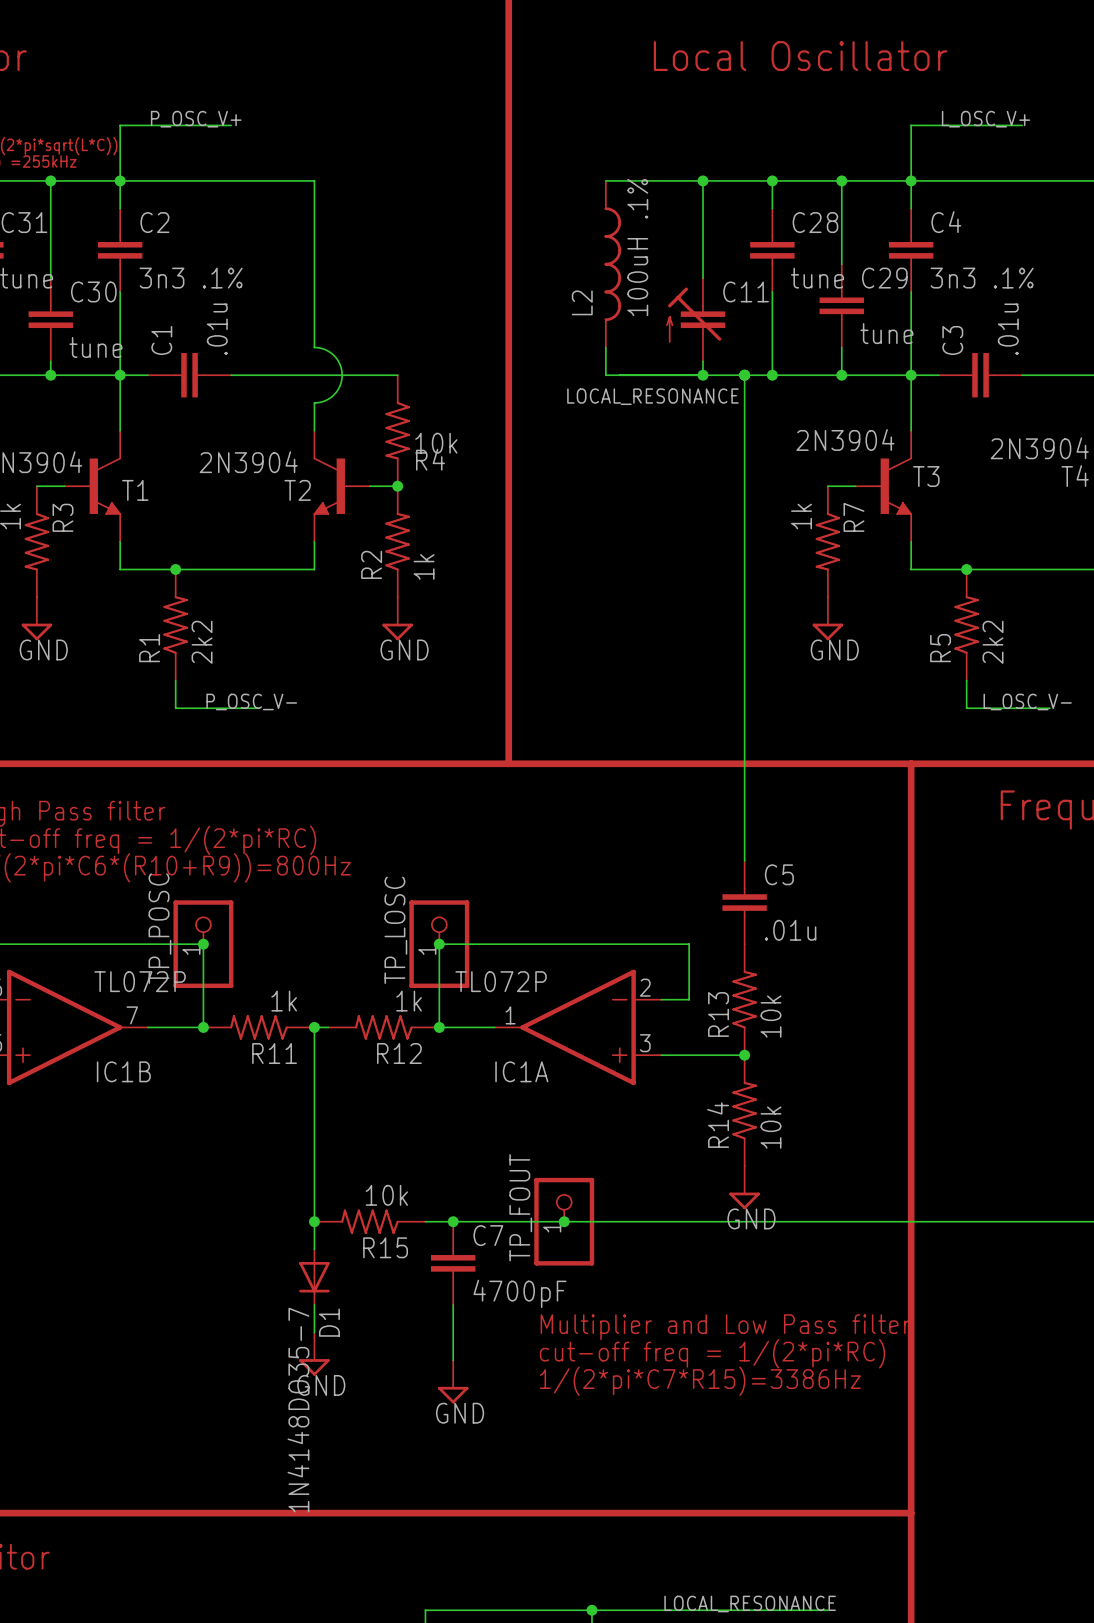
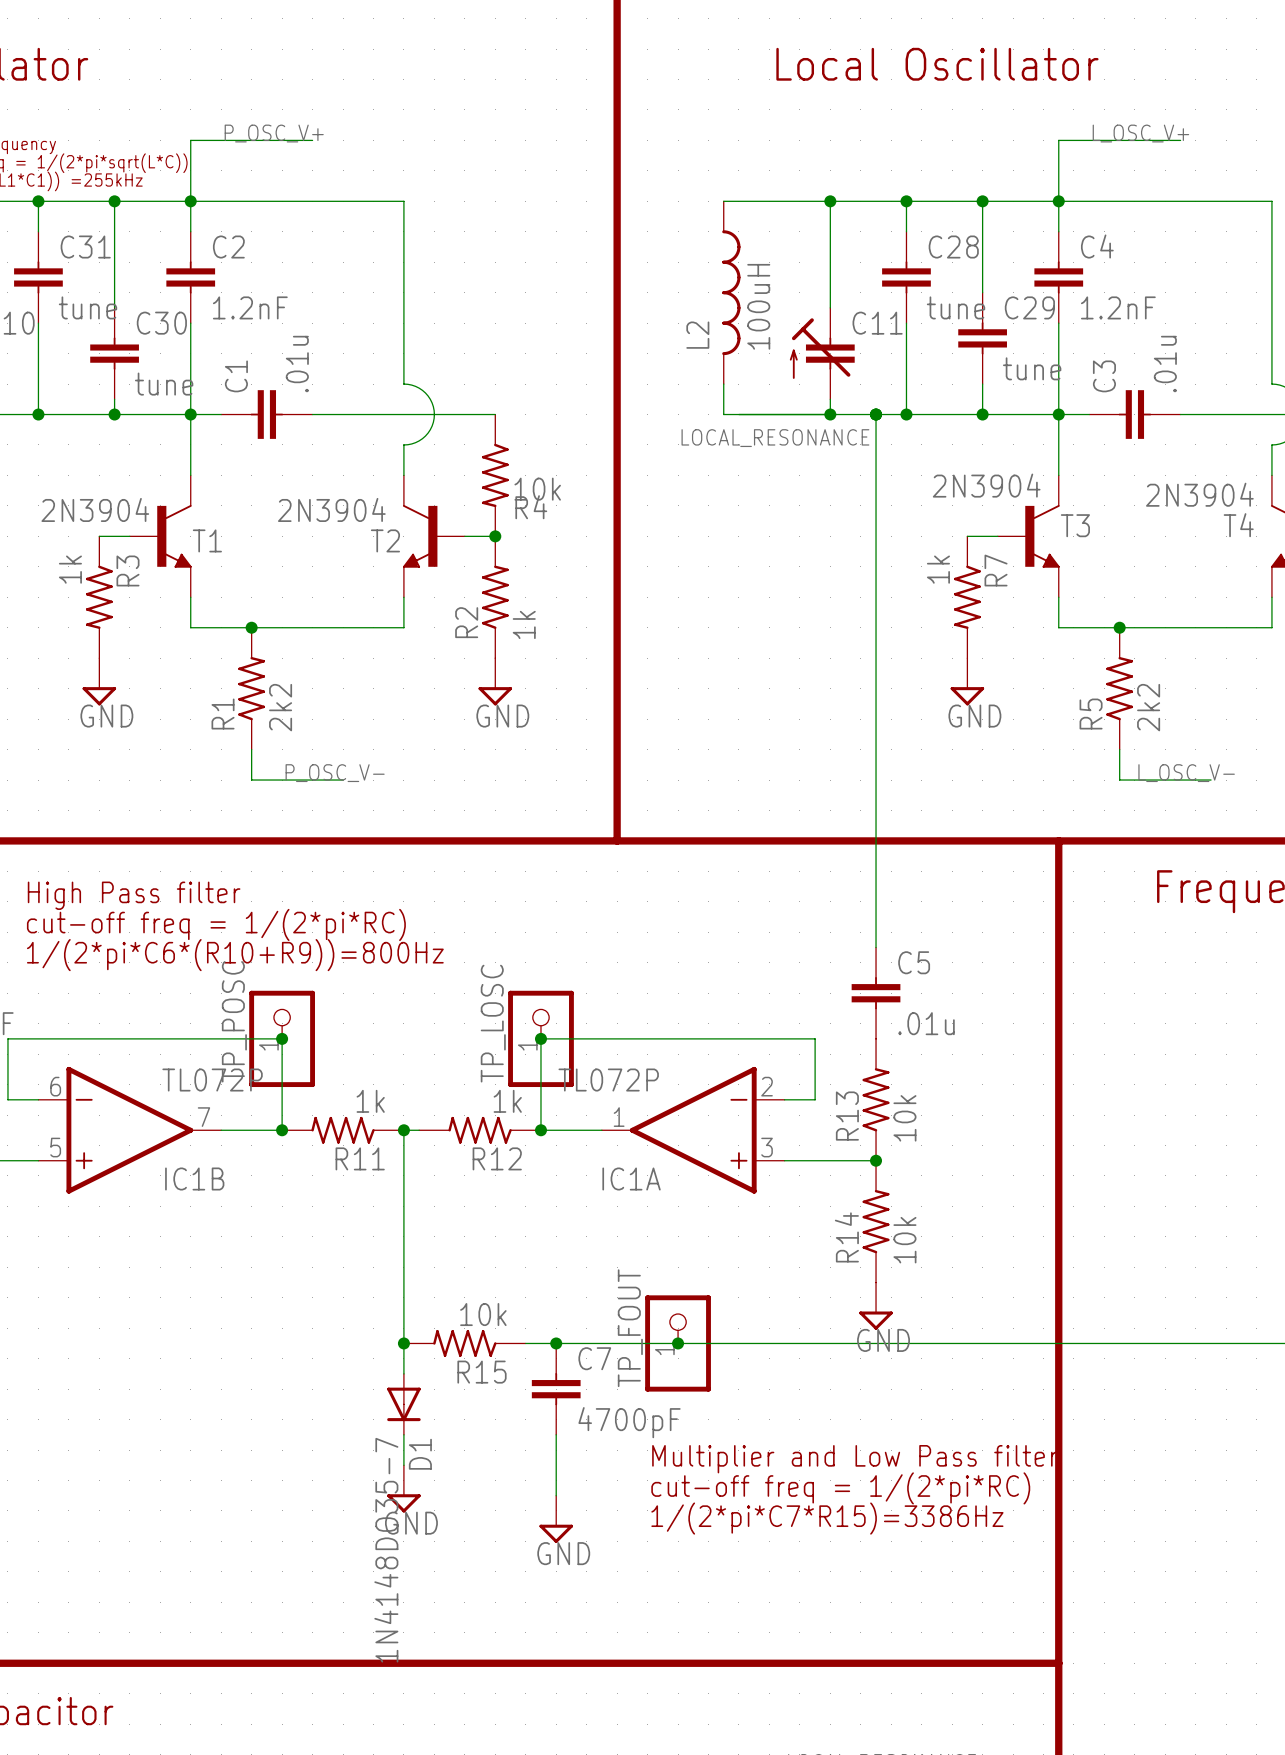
L2 value: 100uH .1% (637, 247) -> 100uH (758, 306)
C2 value: 3n3 .1% (191, 278) -> 1.2nF (250, 307)
C4 value: 3n3 .1% (982, 278) -> 1.2nF (1118, 307)

